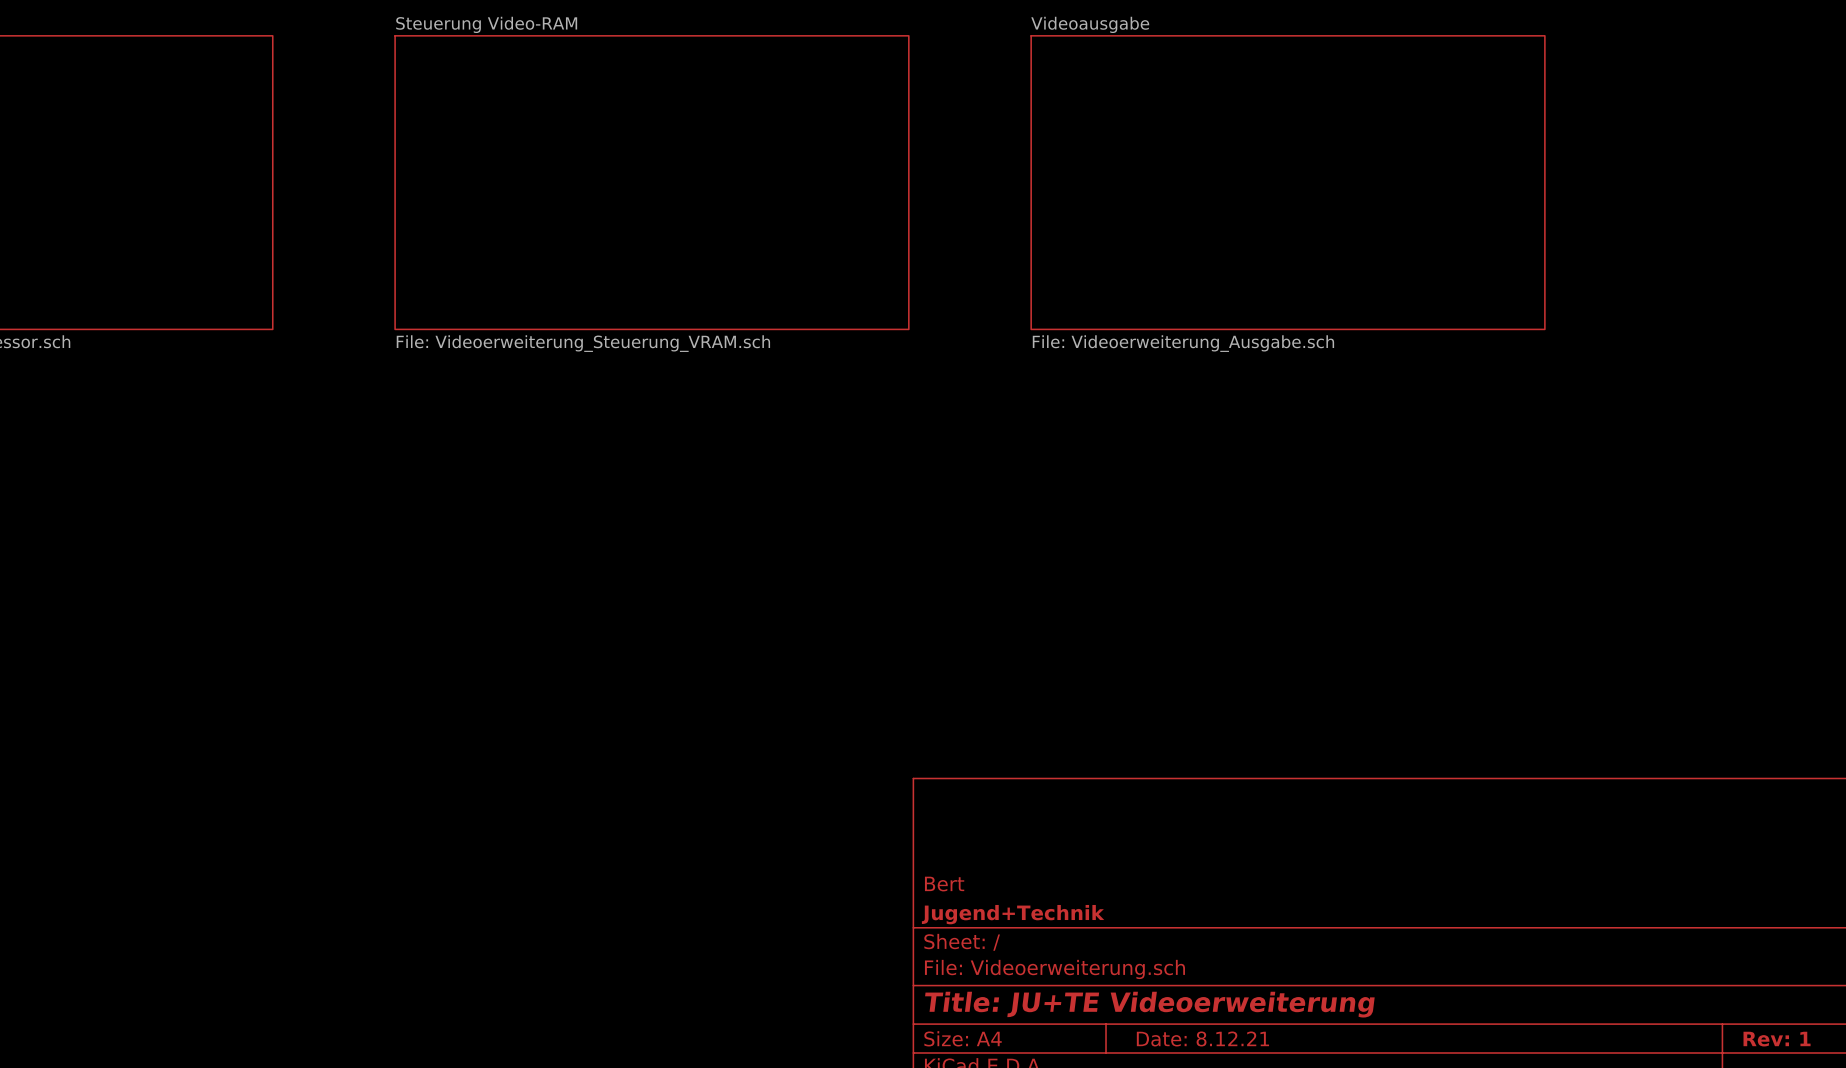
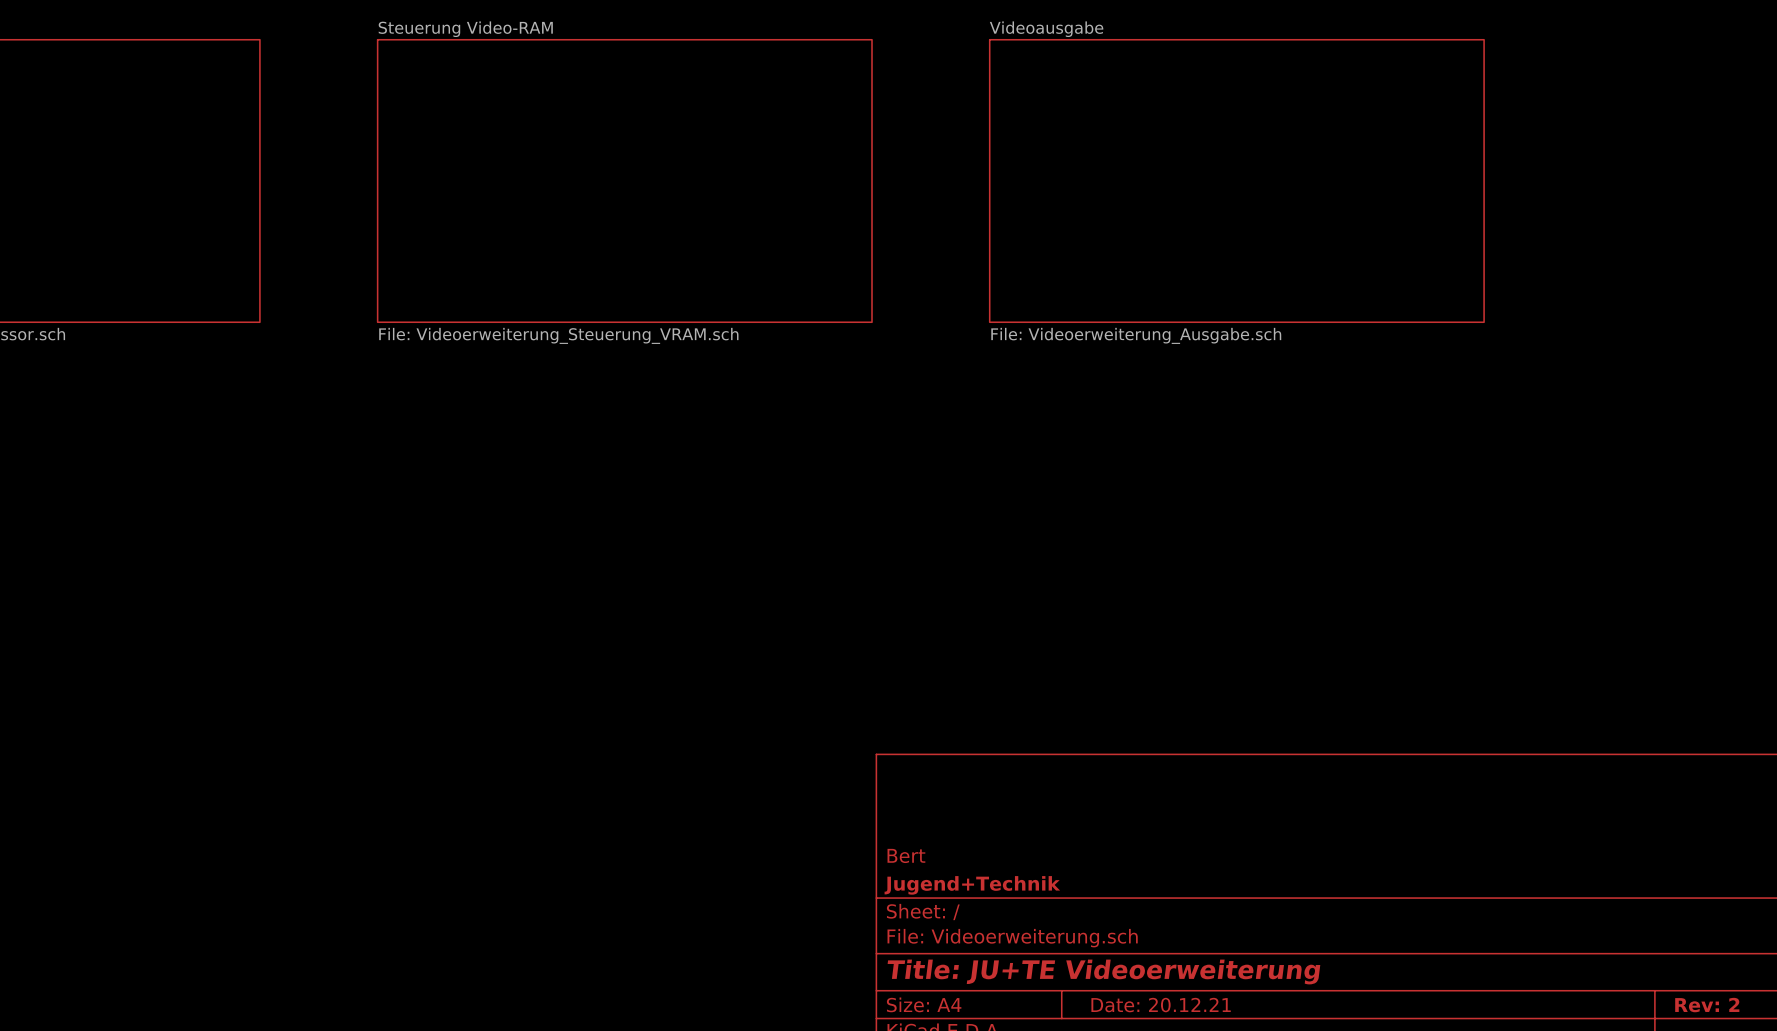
title block: Date: 8.12.21 (1202, 1038) -> Date: 20.12.21 (1161, 1005)
title block: Rev: 1 (1777, 1039) -> Rev: 2 (1707, 1005)

